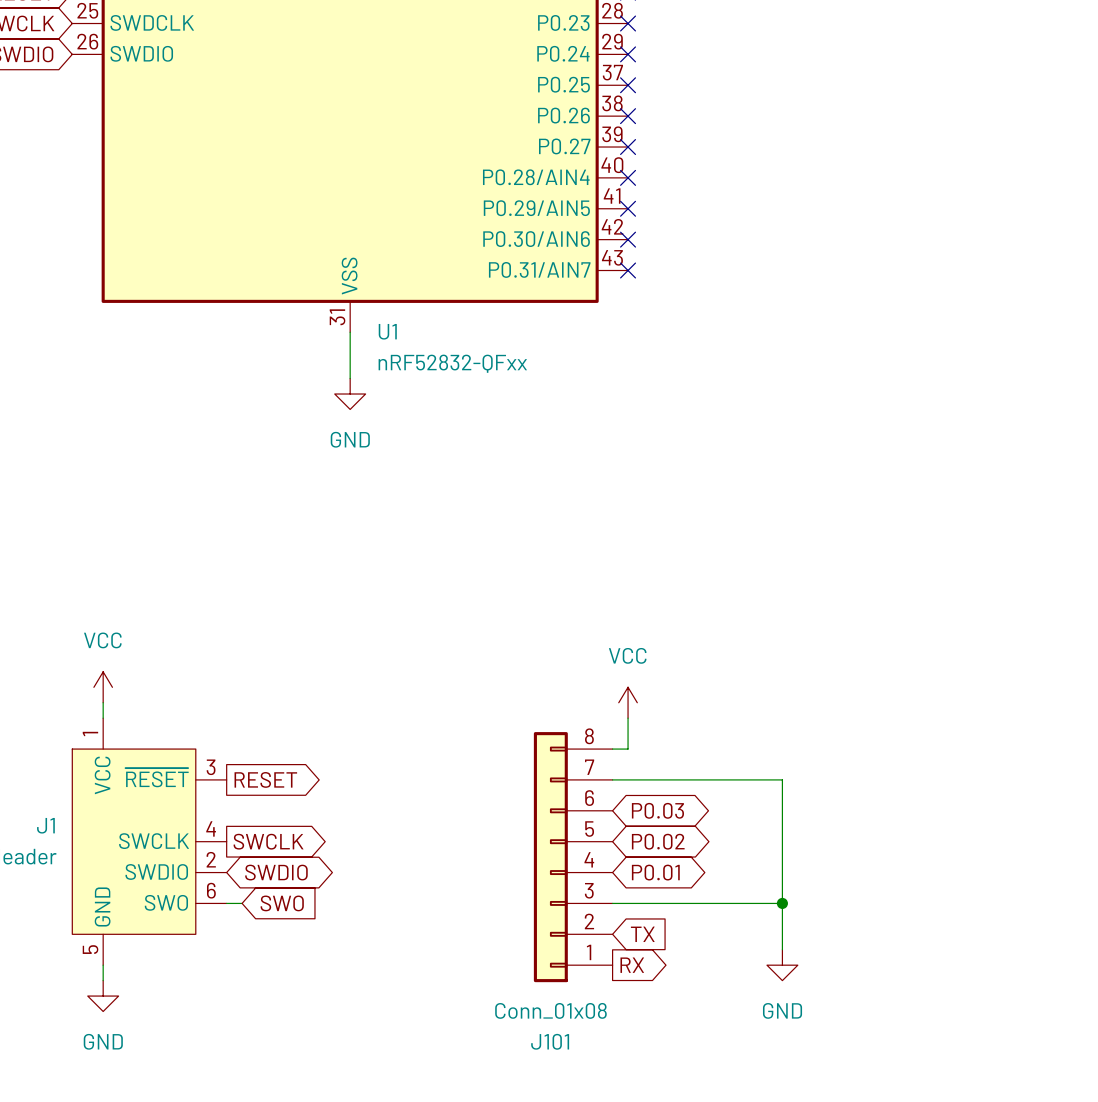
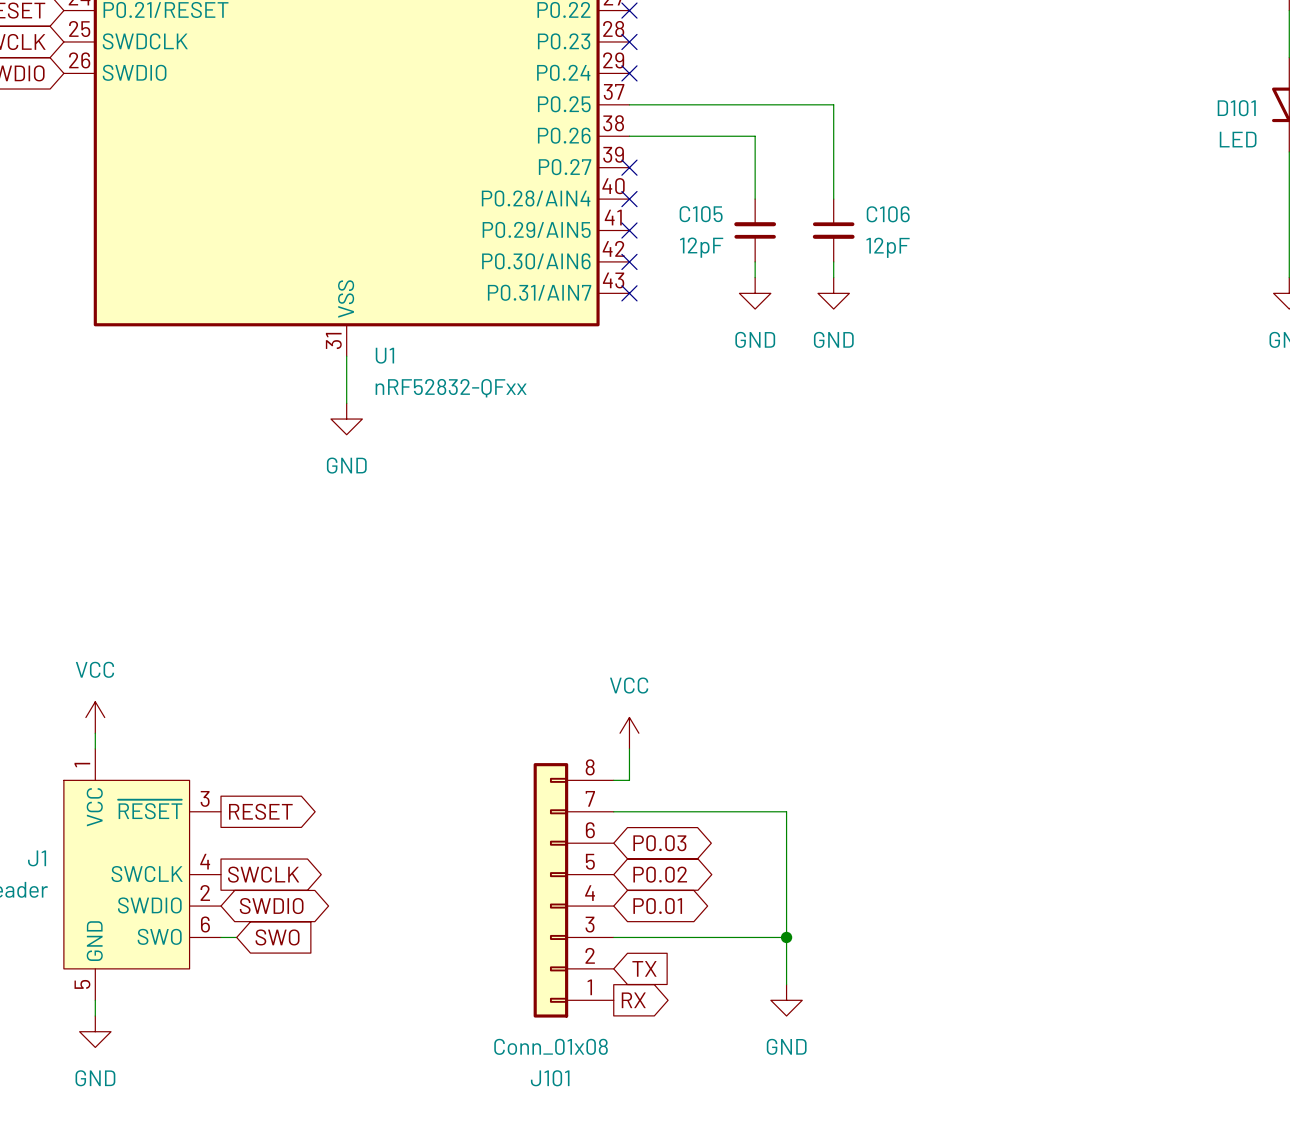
wire: none -> (629, 104) (833, 104) (833, 199)
no-connect mark: (628, 85) -> none
wire: none -> (629, 136) (755, 136) (755, 199)
no-connect mark: (628, 116) -> none
C105: none -> 12pF (755, 230)
C106: none -> 12pF (833, 230)
wire: none -> (755, 261) (755, 277)
wire: none -> (833, 261) (833, 277)
power symbol: none -> GND (755, 293)
power symbol: none -> GND (833, 293)

